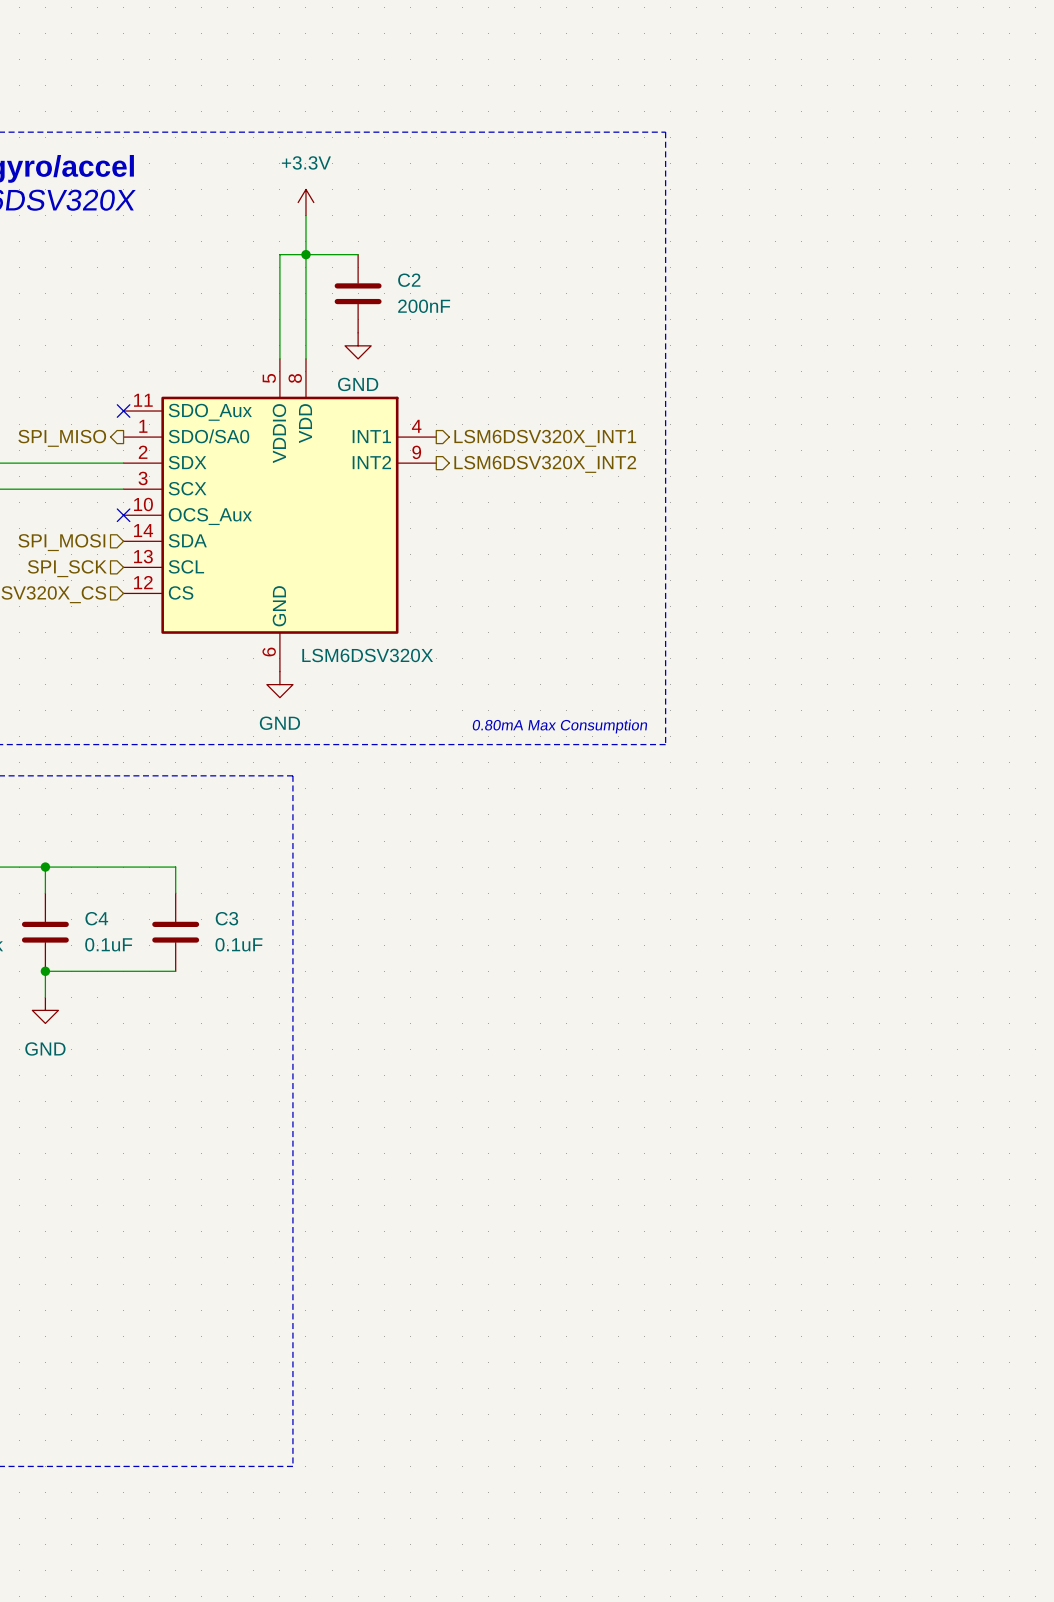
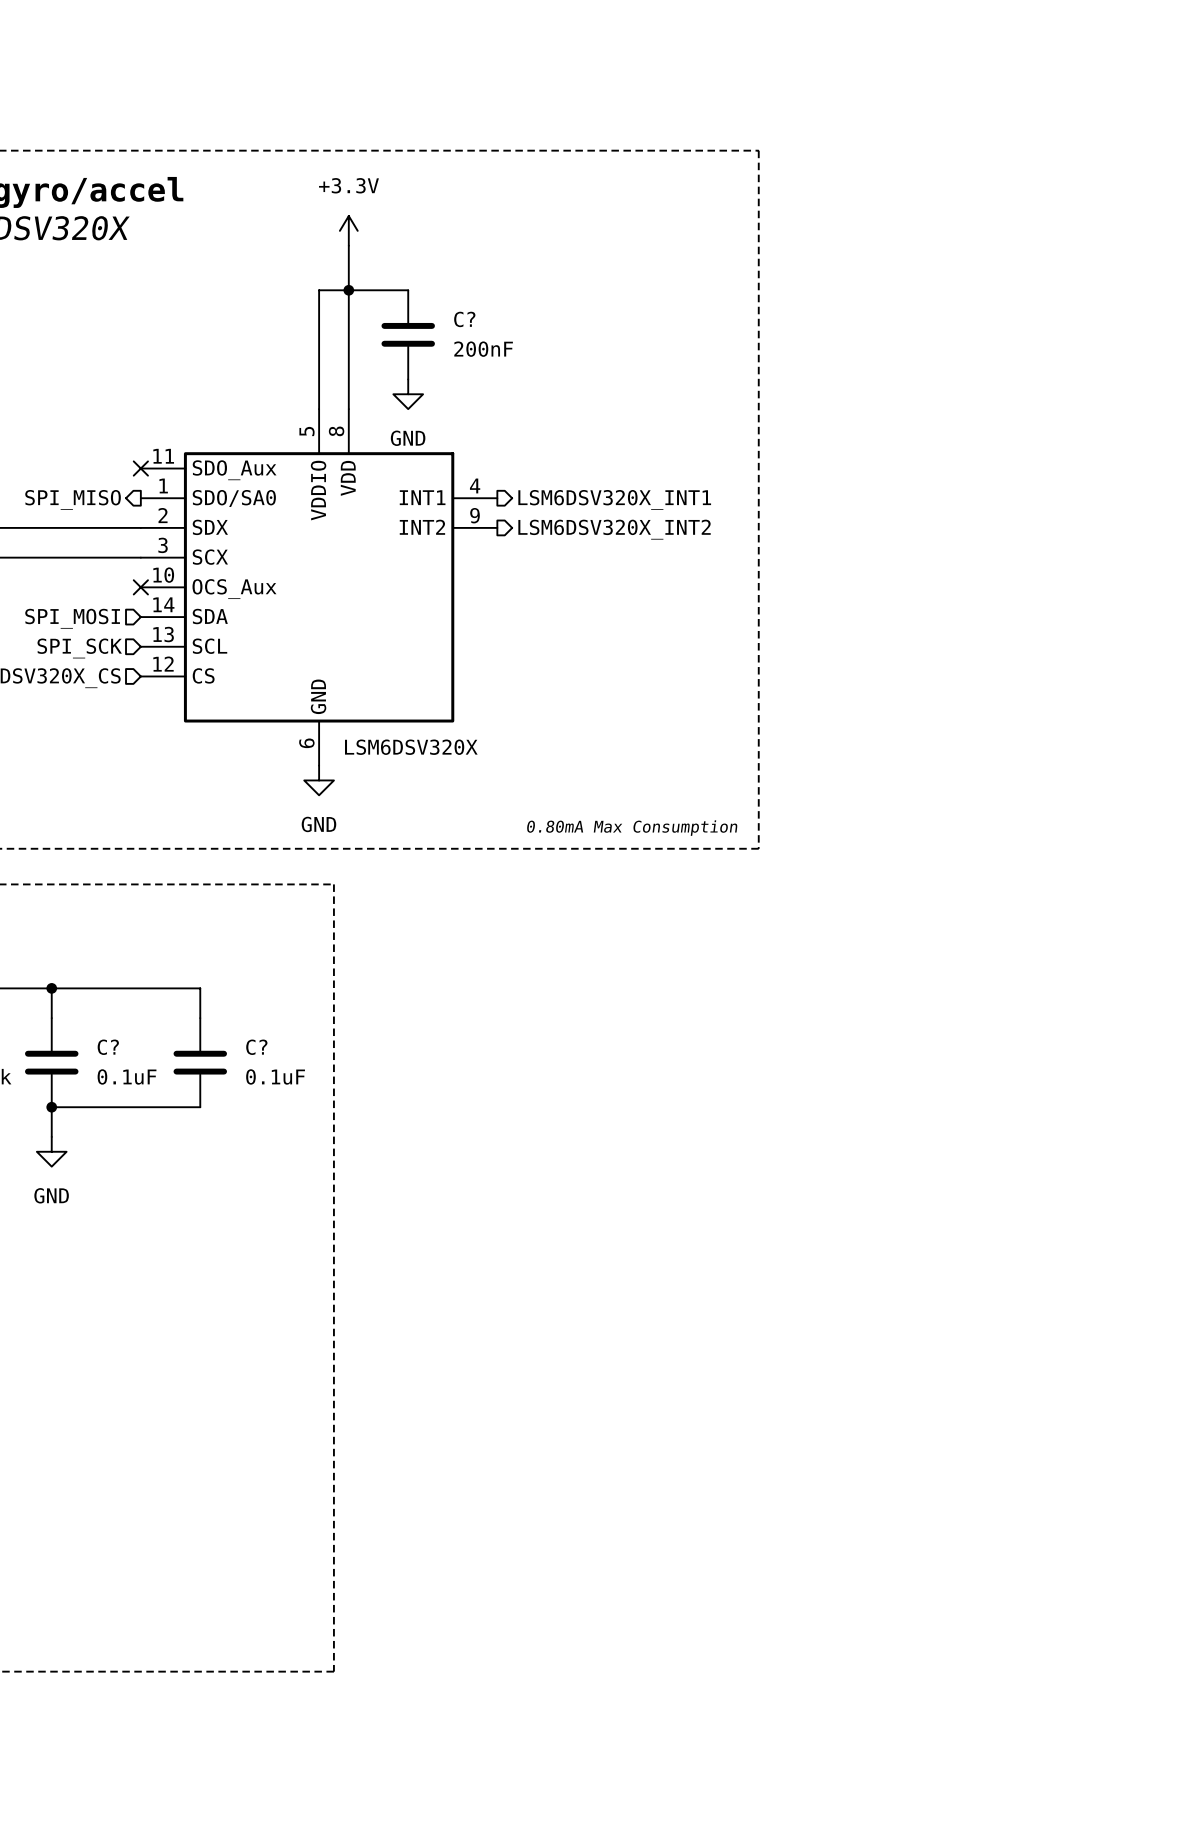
C2 name: C2 (409, 280) -> C? (464, 319)
C4 name: C4 (96, 918) -> C? (108, 1047)
C3 name: C3 (226, 918) -> C? (256, 1047)

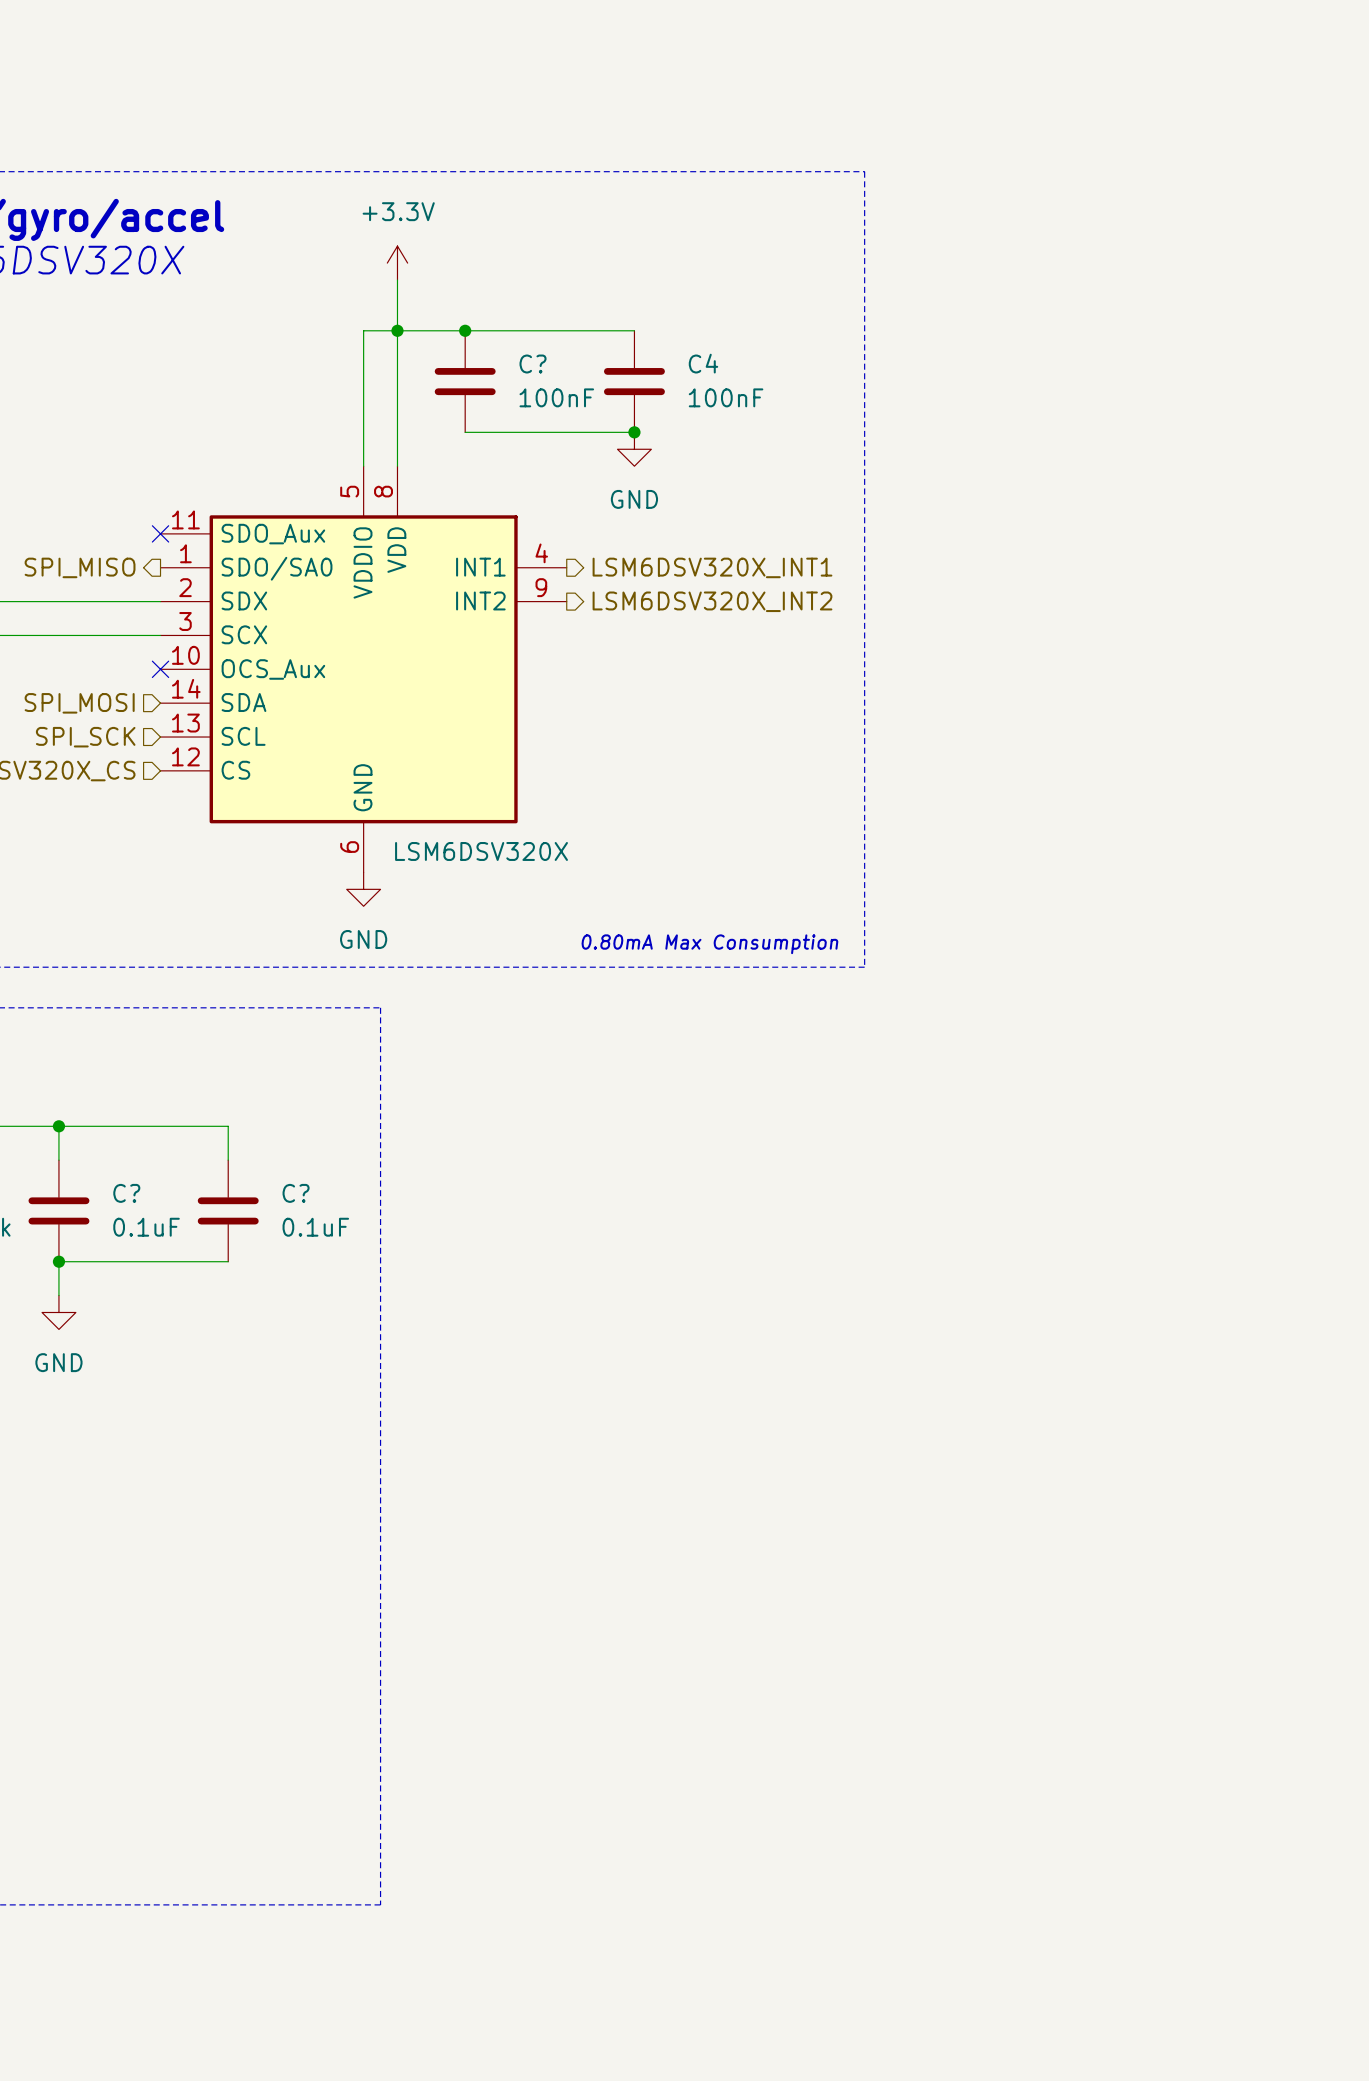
wire: none -> (465, 330) (634, 330)
junction: none -> (465, 330)
C4: none -> 100nF (634, 381)
C? value: 200nF (483, 349) -> 100nF (556, 397)
wire: none -> (465, 432) (634, 432)
junction: none -> (634, 432)
power symbol position: GND (408, 394) -> GND (634, 449)

